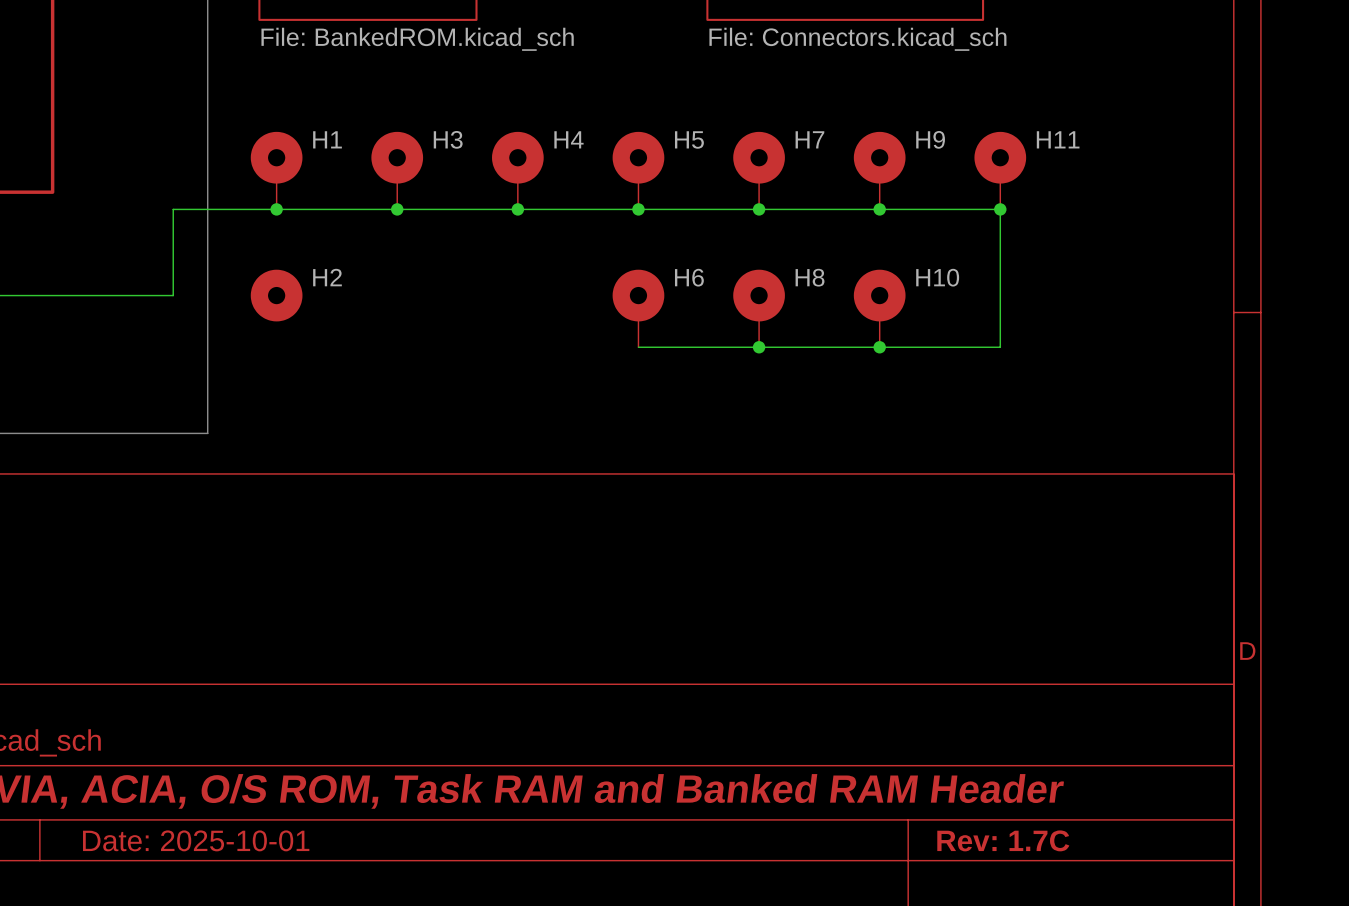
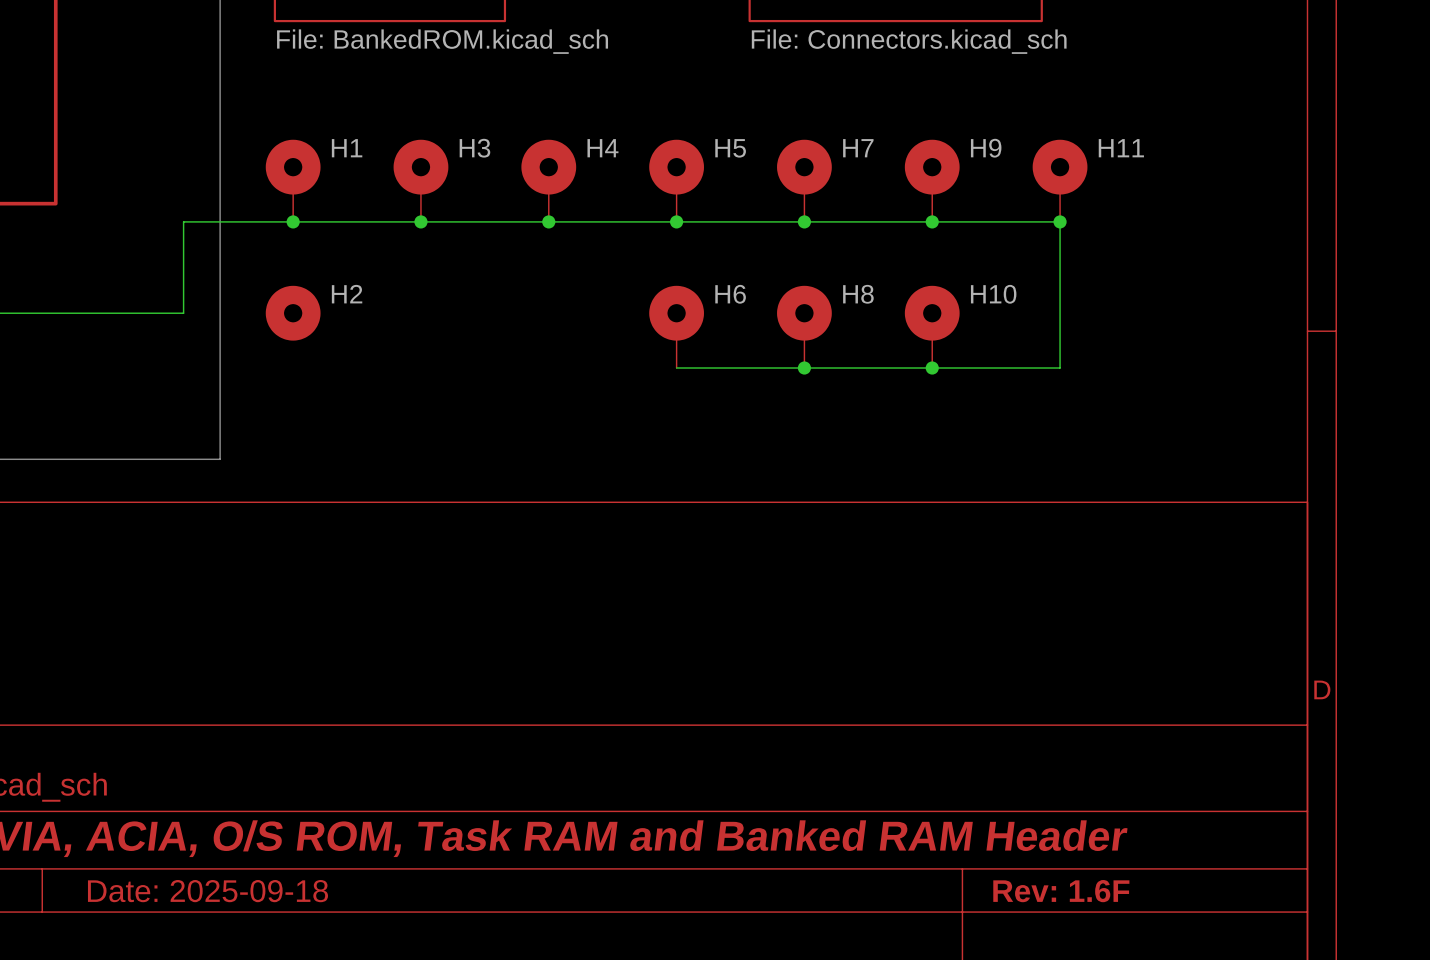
title block: Date: 2025-10-01 (196, 840) -> Date: 2025-09-18 (207, 891)
title block: Rev: 1.7C (1003, 840) -> Rev: 1.6F (1061, 891)

